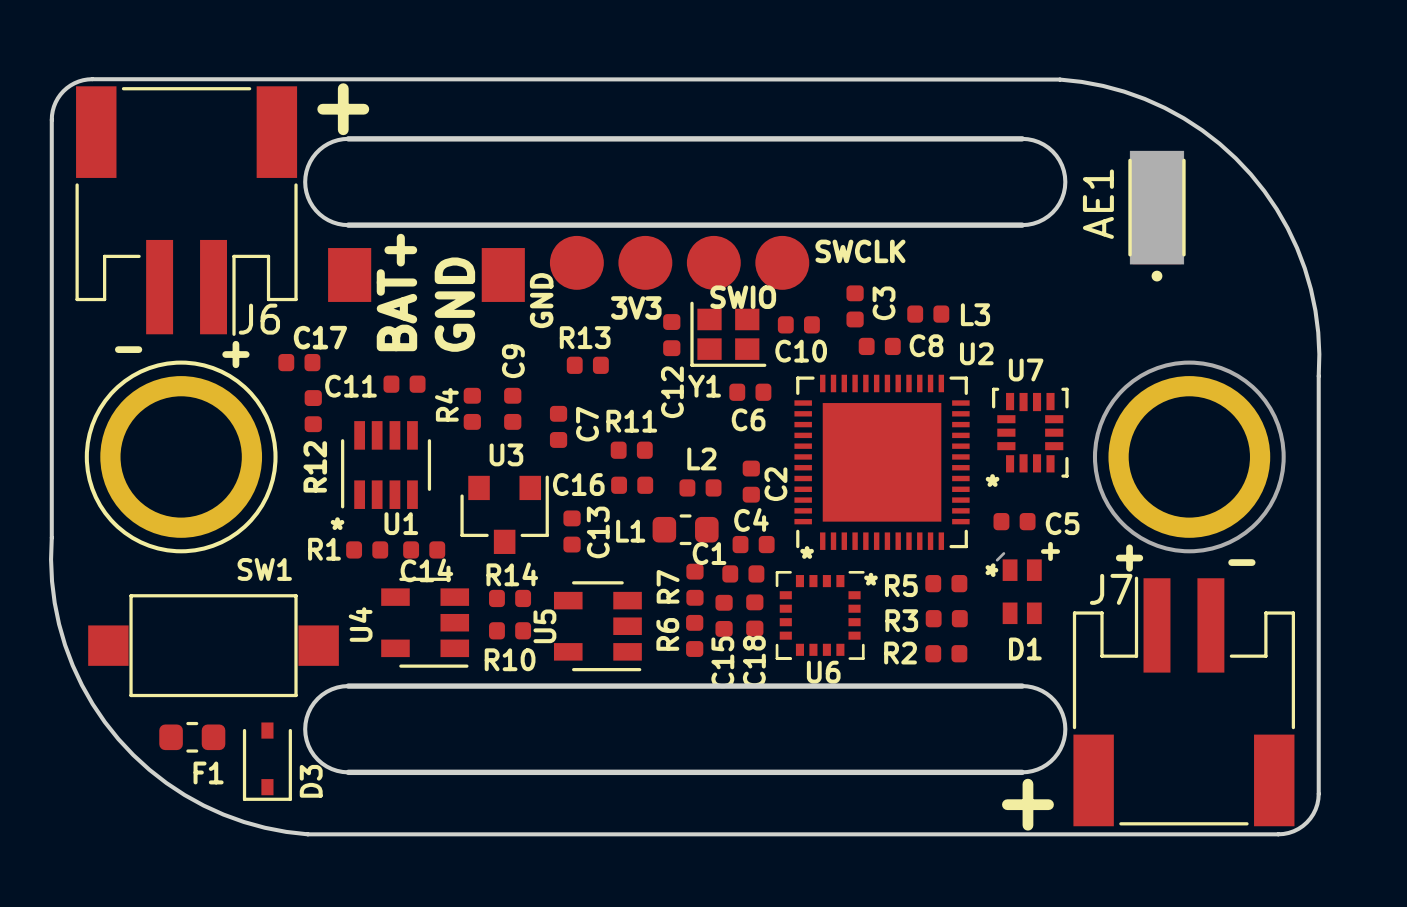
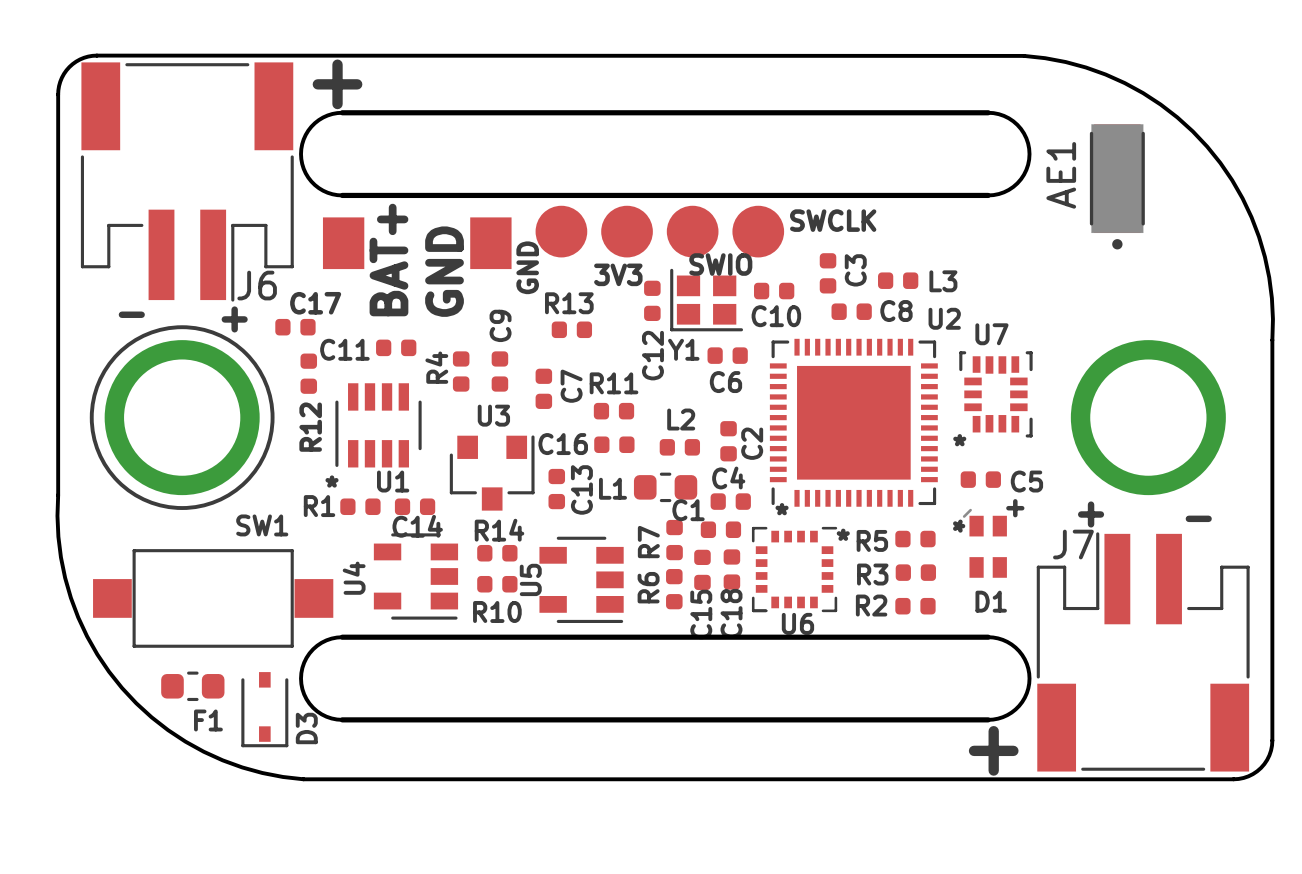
drawing: [1092, 360, 1286, 554] -> none

